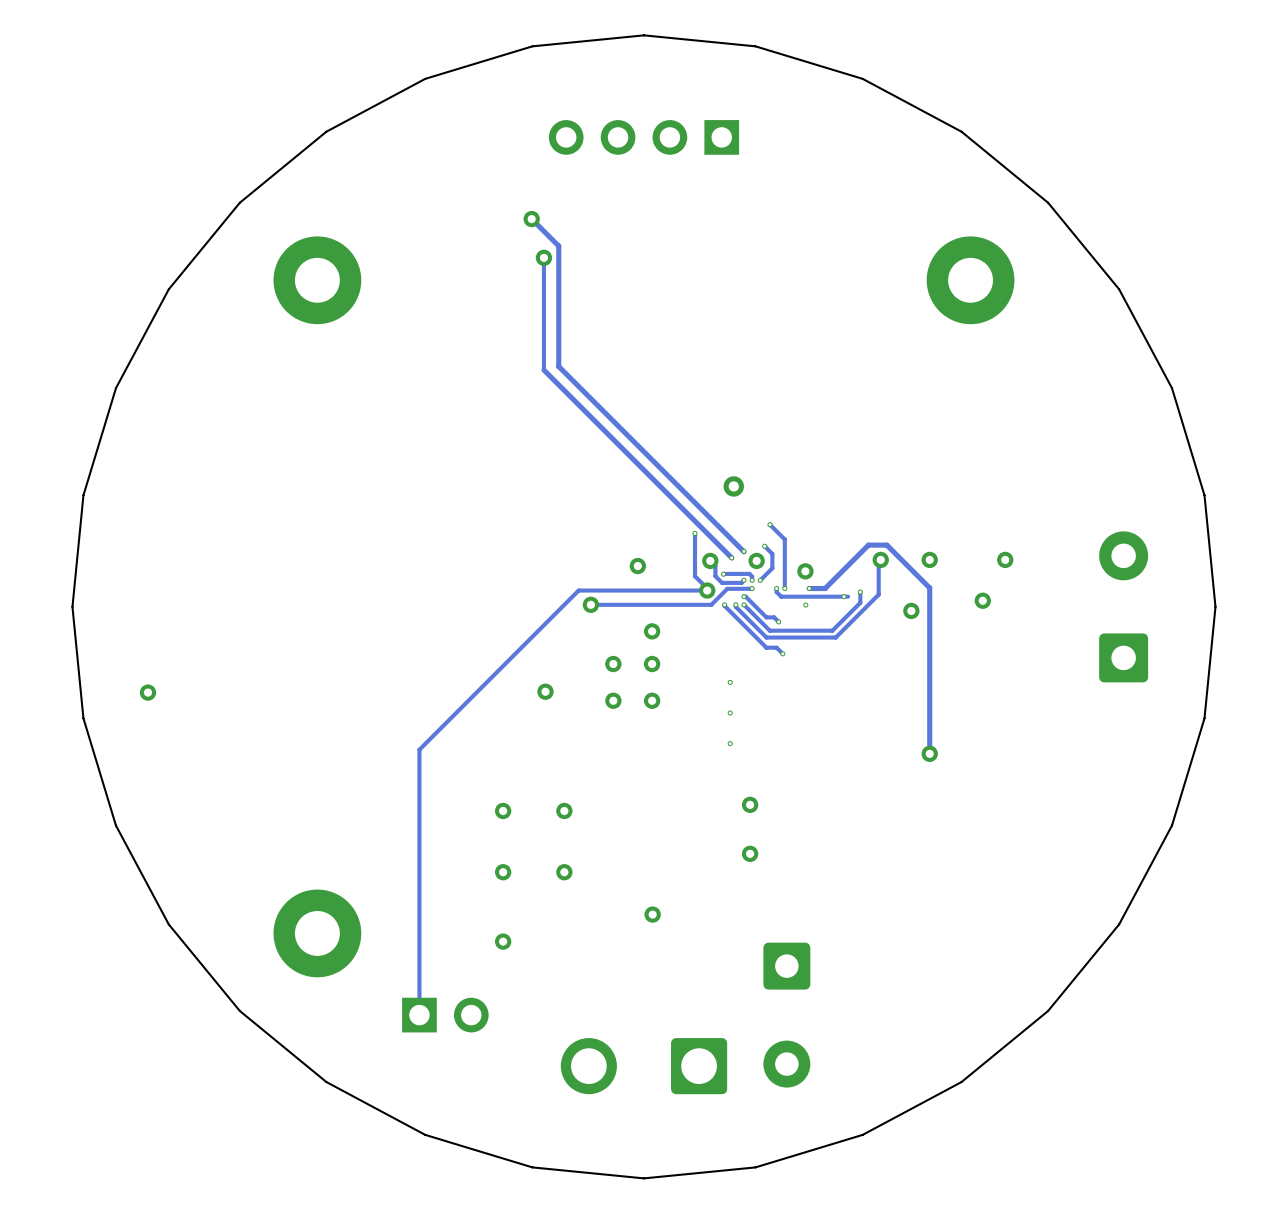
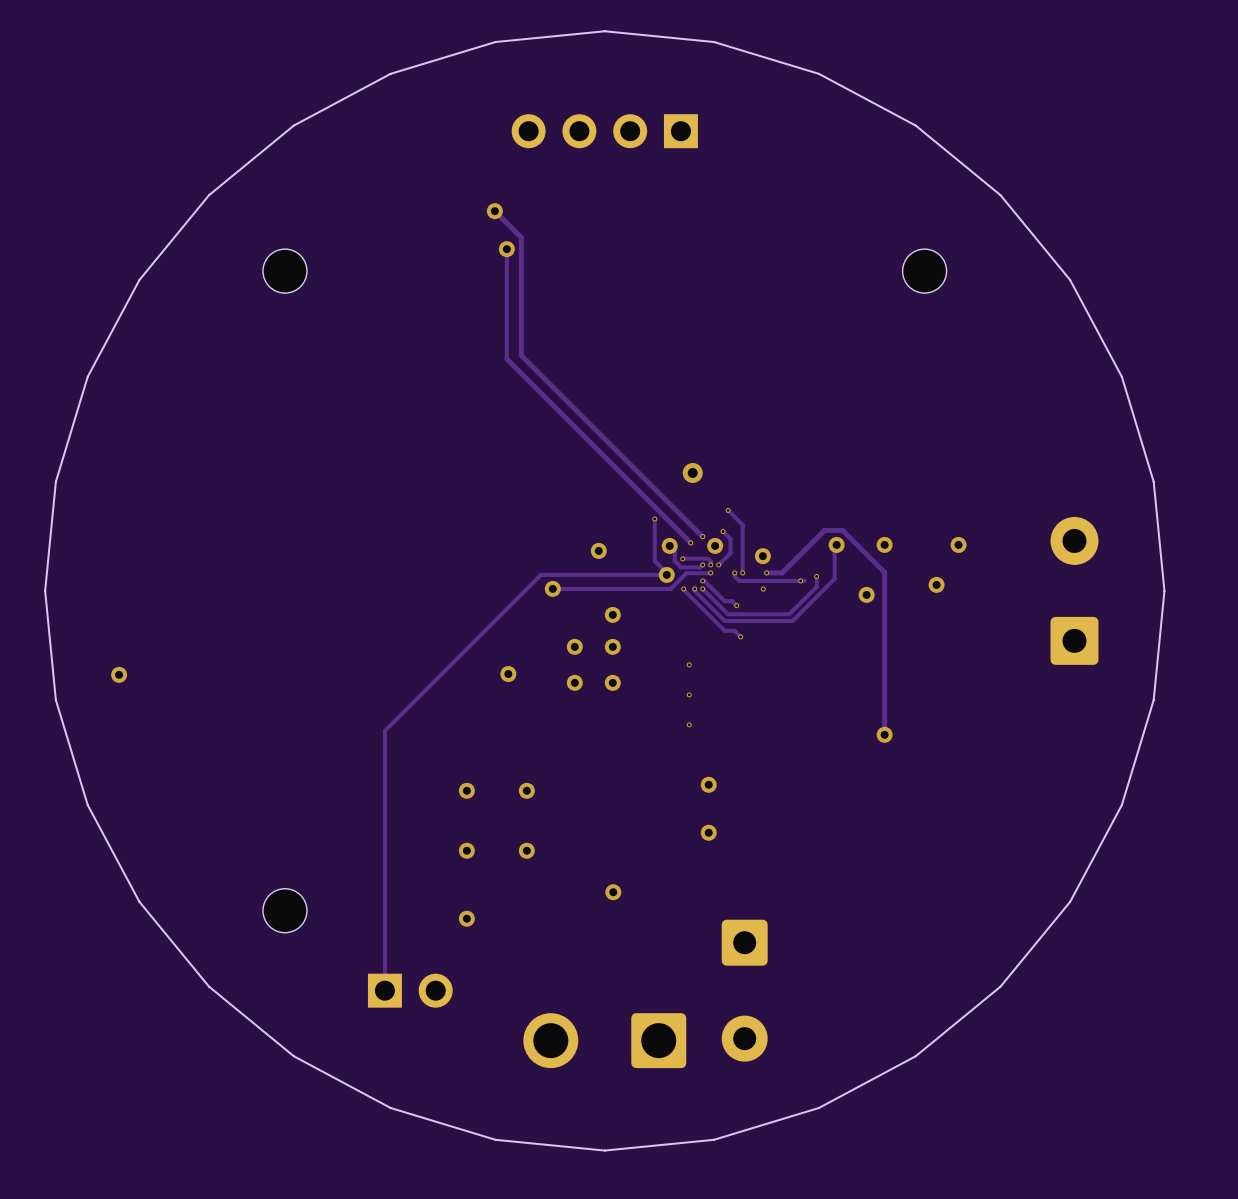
part footprint: [273, 236, 362, 325] -> [263, 249, 307, 294]
part footprint: [926, 236, 1015, 325] -> [902, 249, 947, 294]
part footprint: [273, 889, 362, 978] -> [263, 888, 307, 933]

